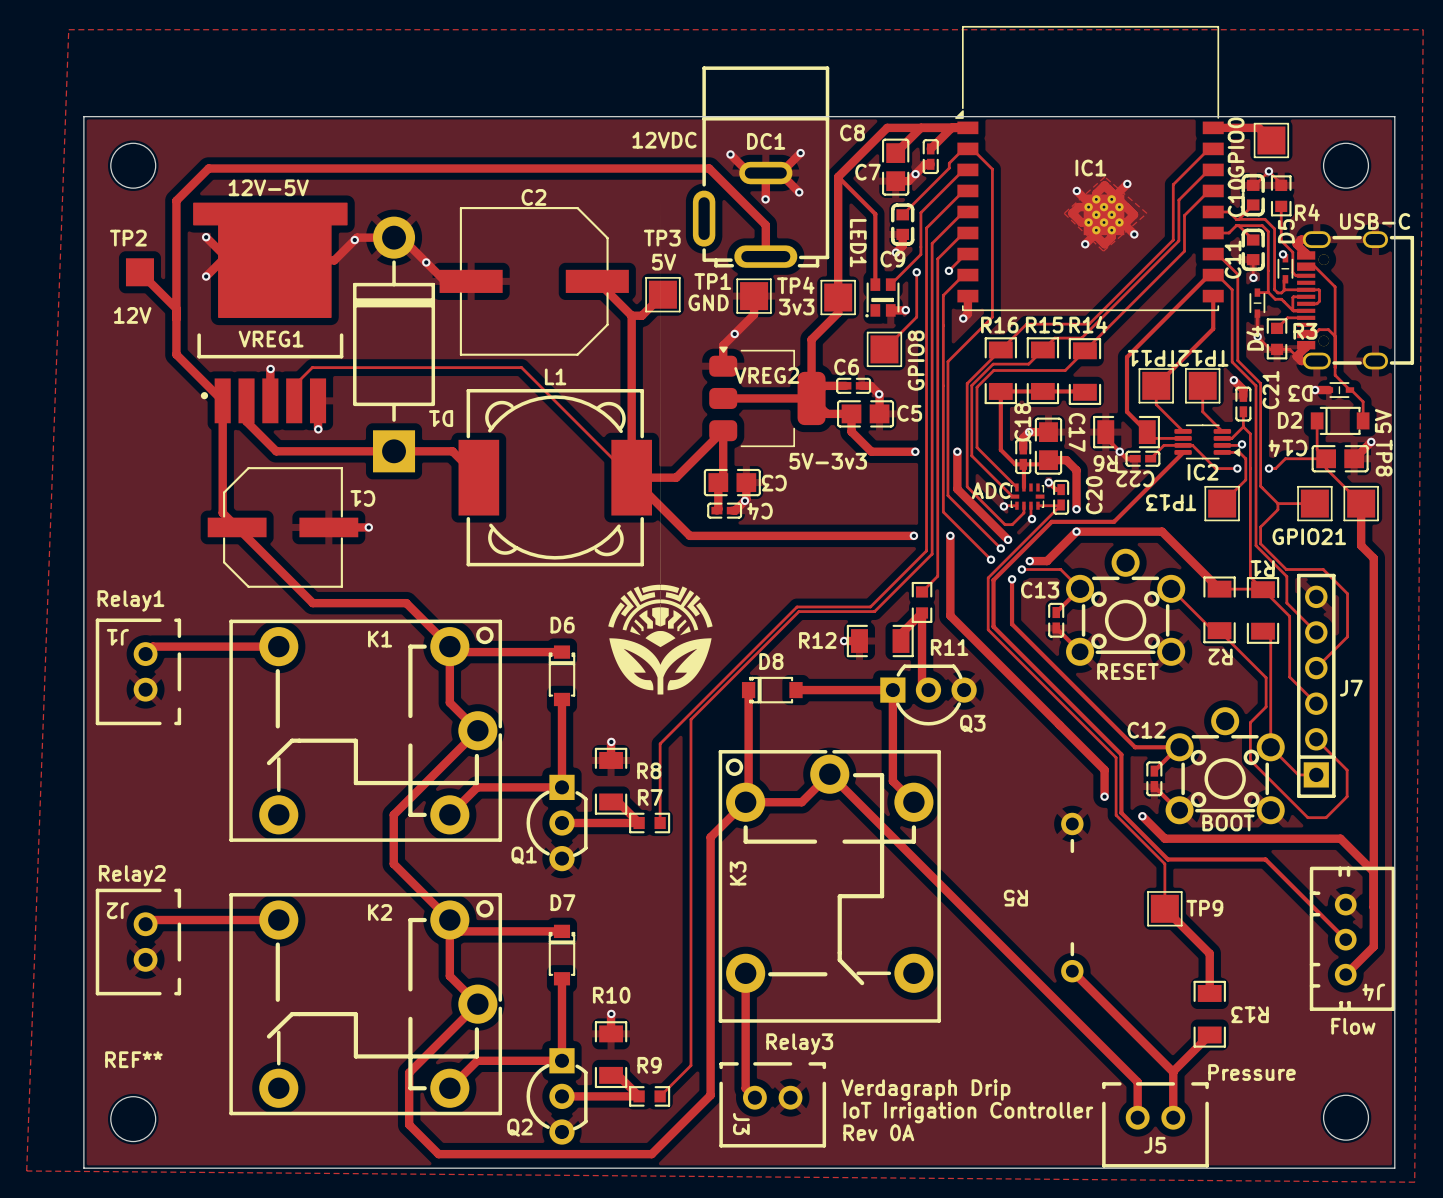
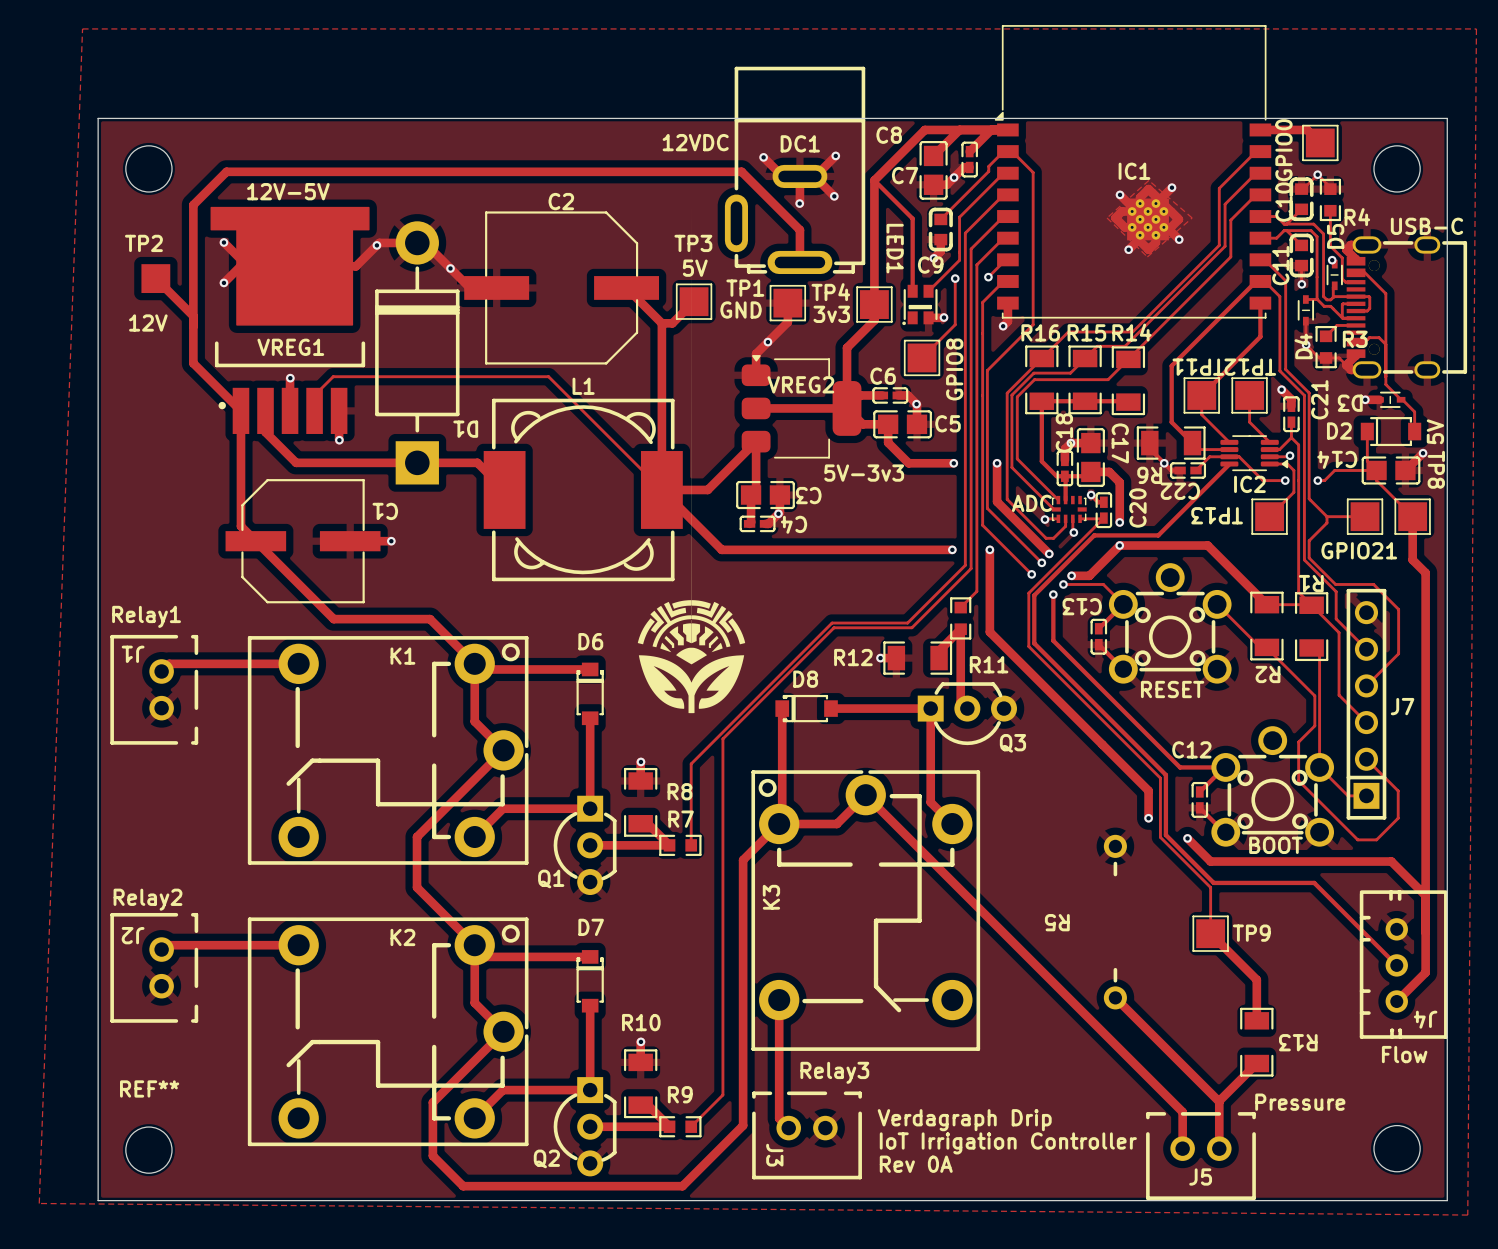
C13 name rotation: 0° (1040, 590) -> 180° (1082, 606)

